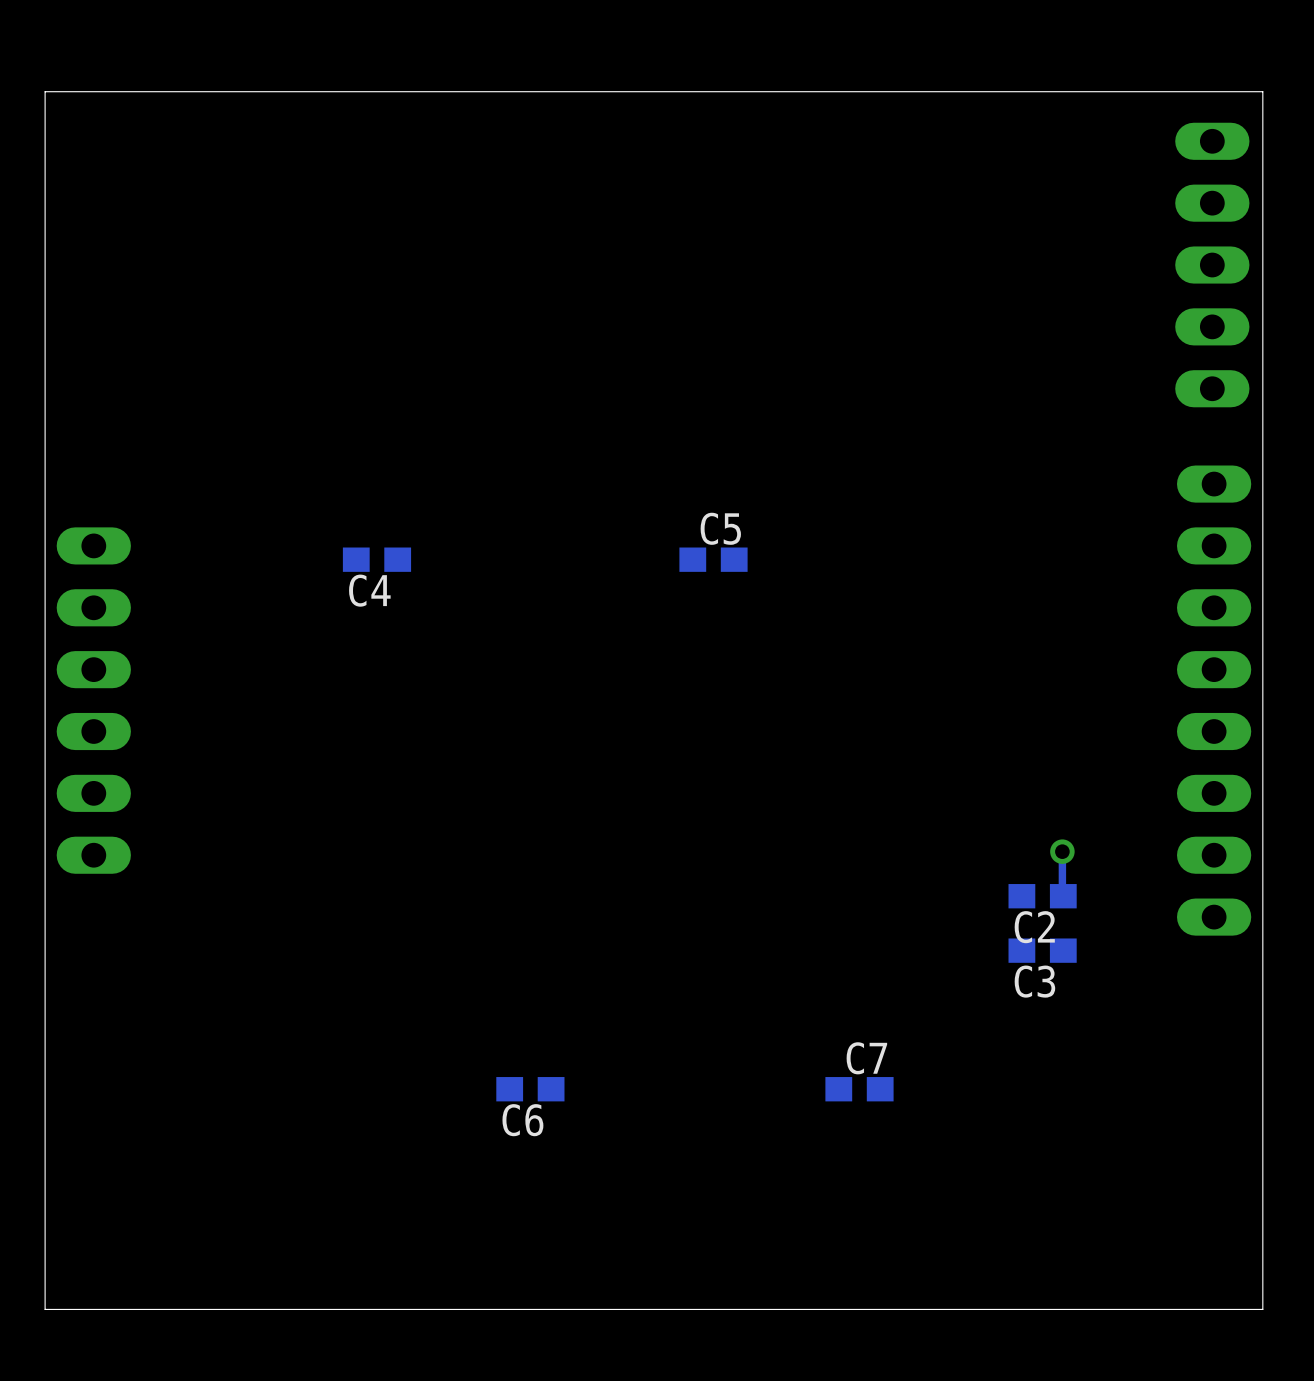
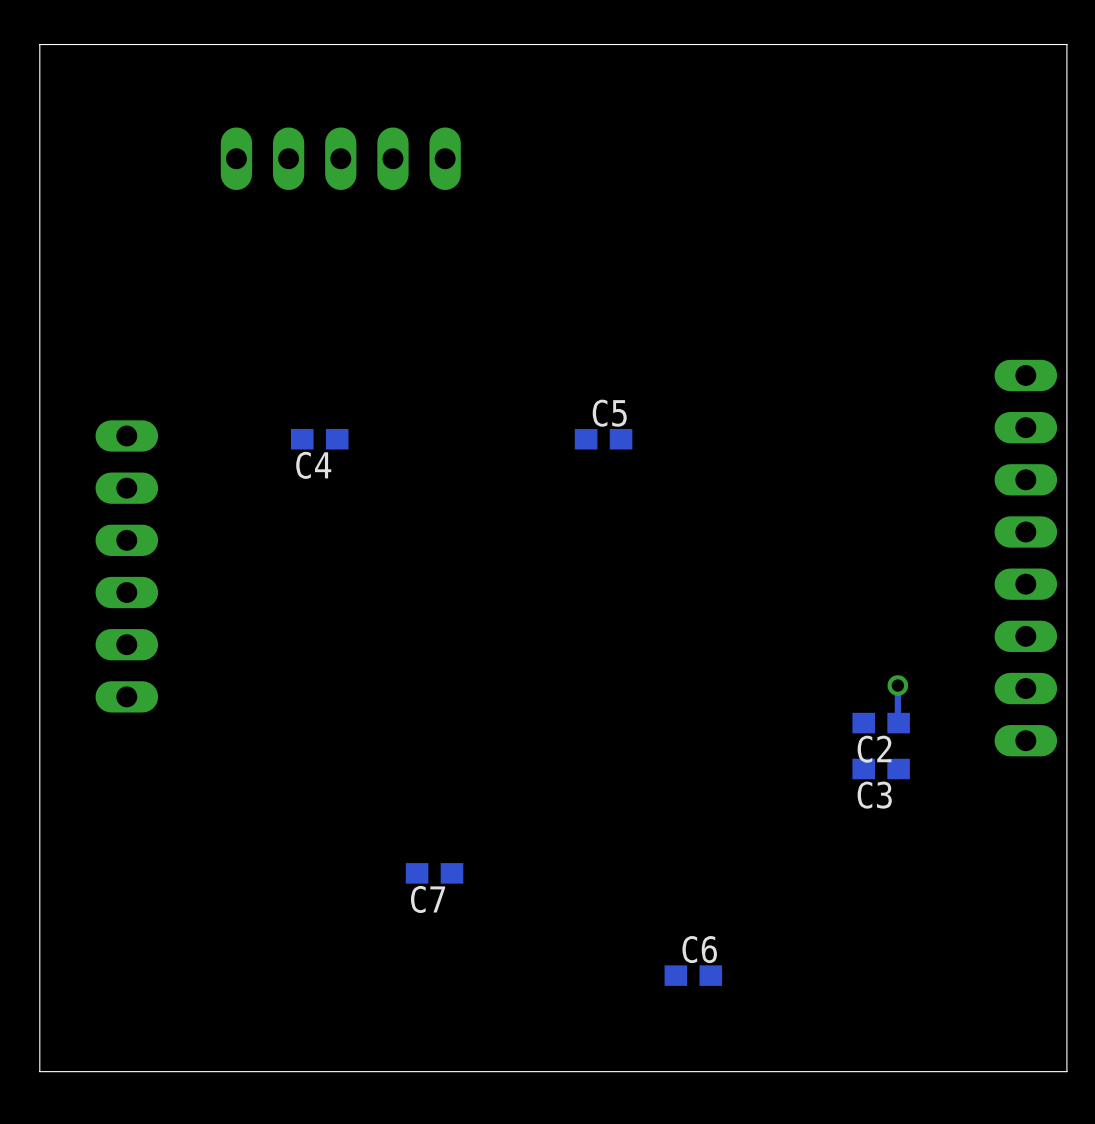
part: none -> (340, 158)
part: (1212, 265) -> none
part position: (93, 700) -> (126, 566)
C7 name position: C7 (866, 1058) -> C7 (428, 899)
C6 position: (530, 1089) -> (693, 975)
C7 position: (859, 1089) -> (434, 873)
C6 name position: C6 (522, 1120) -> C6 (699, 949)

